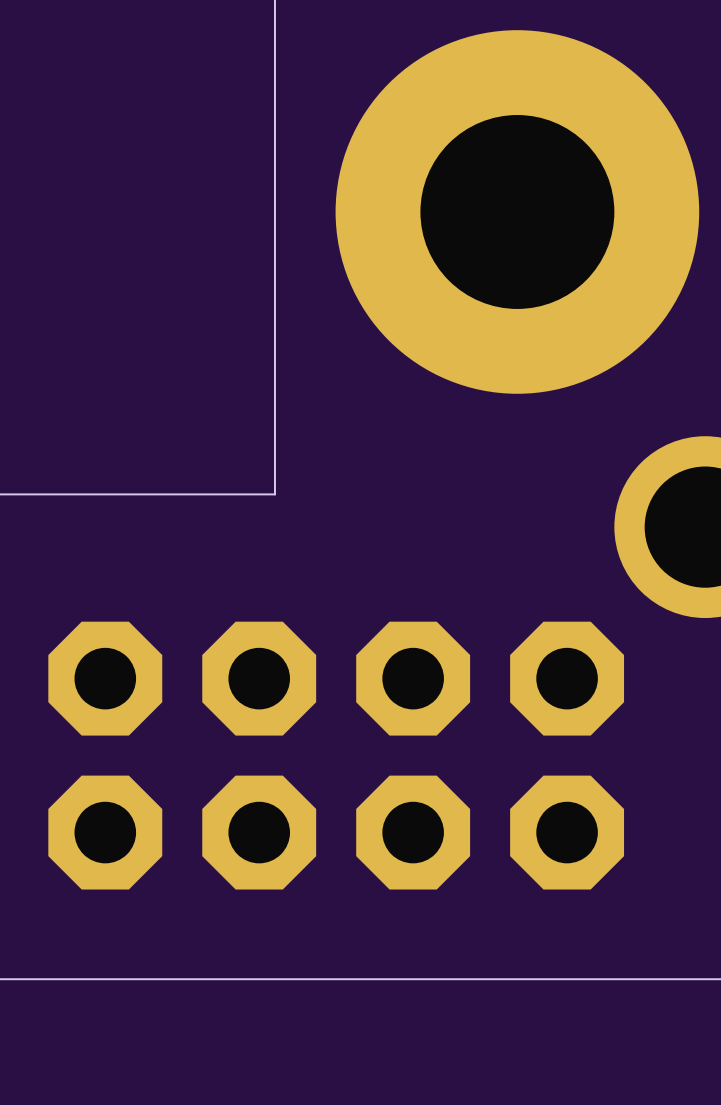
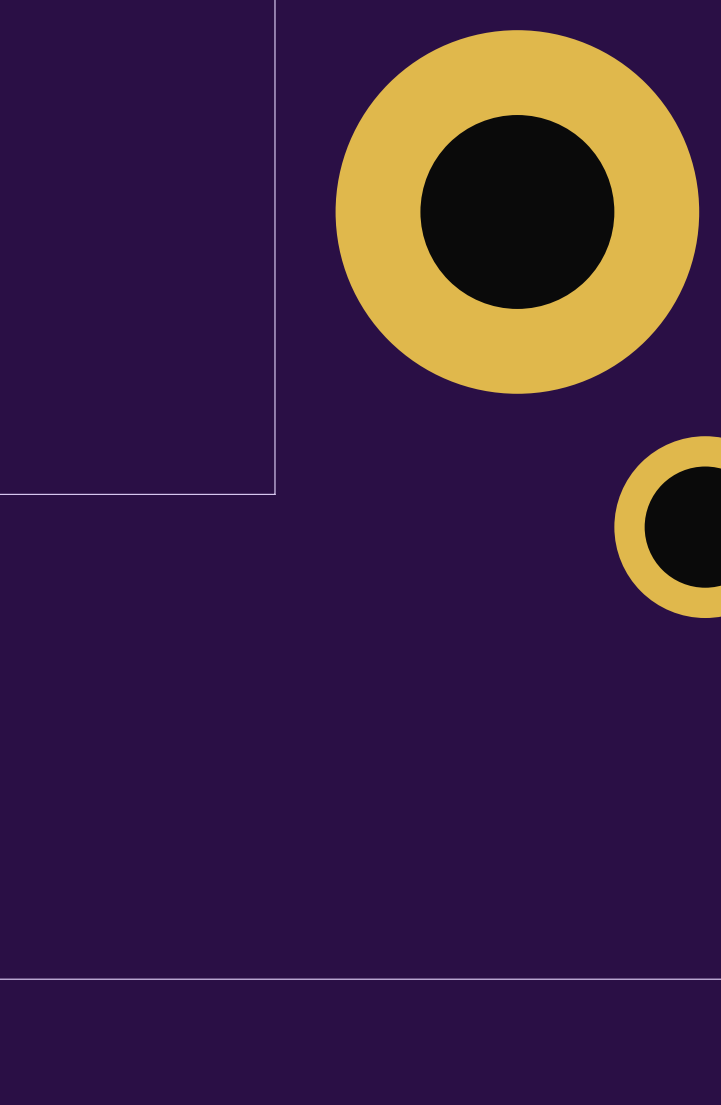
part: (336, 755) -> none

